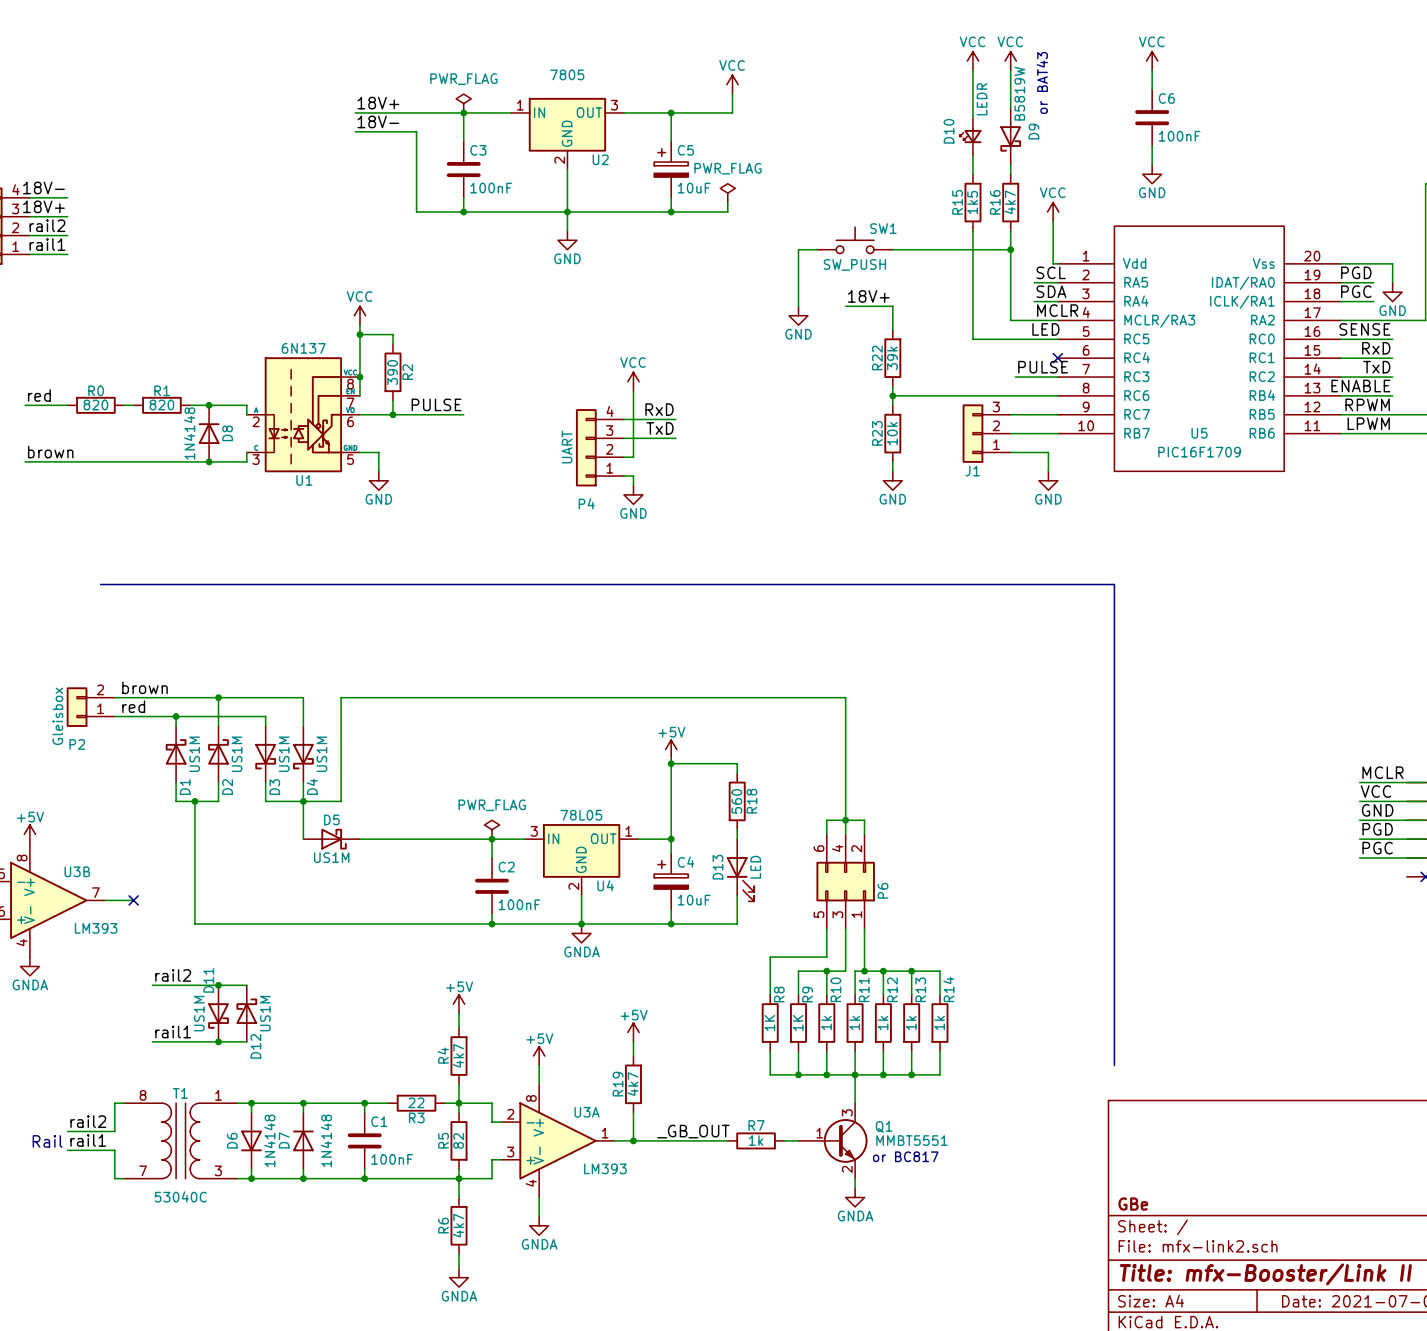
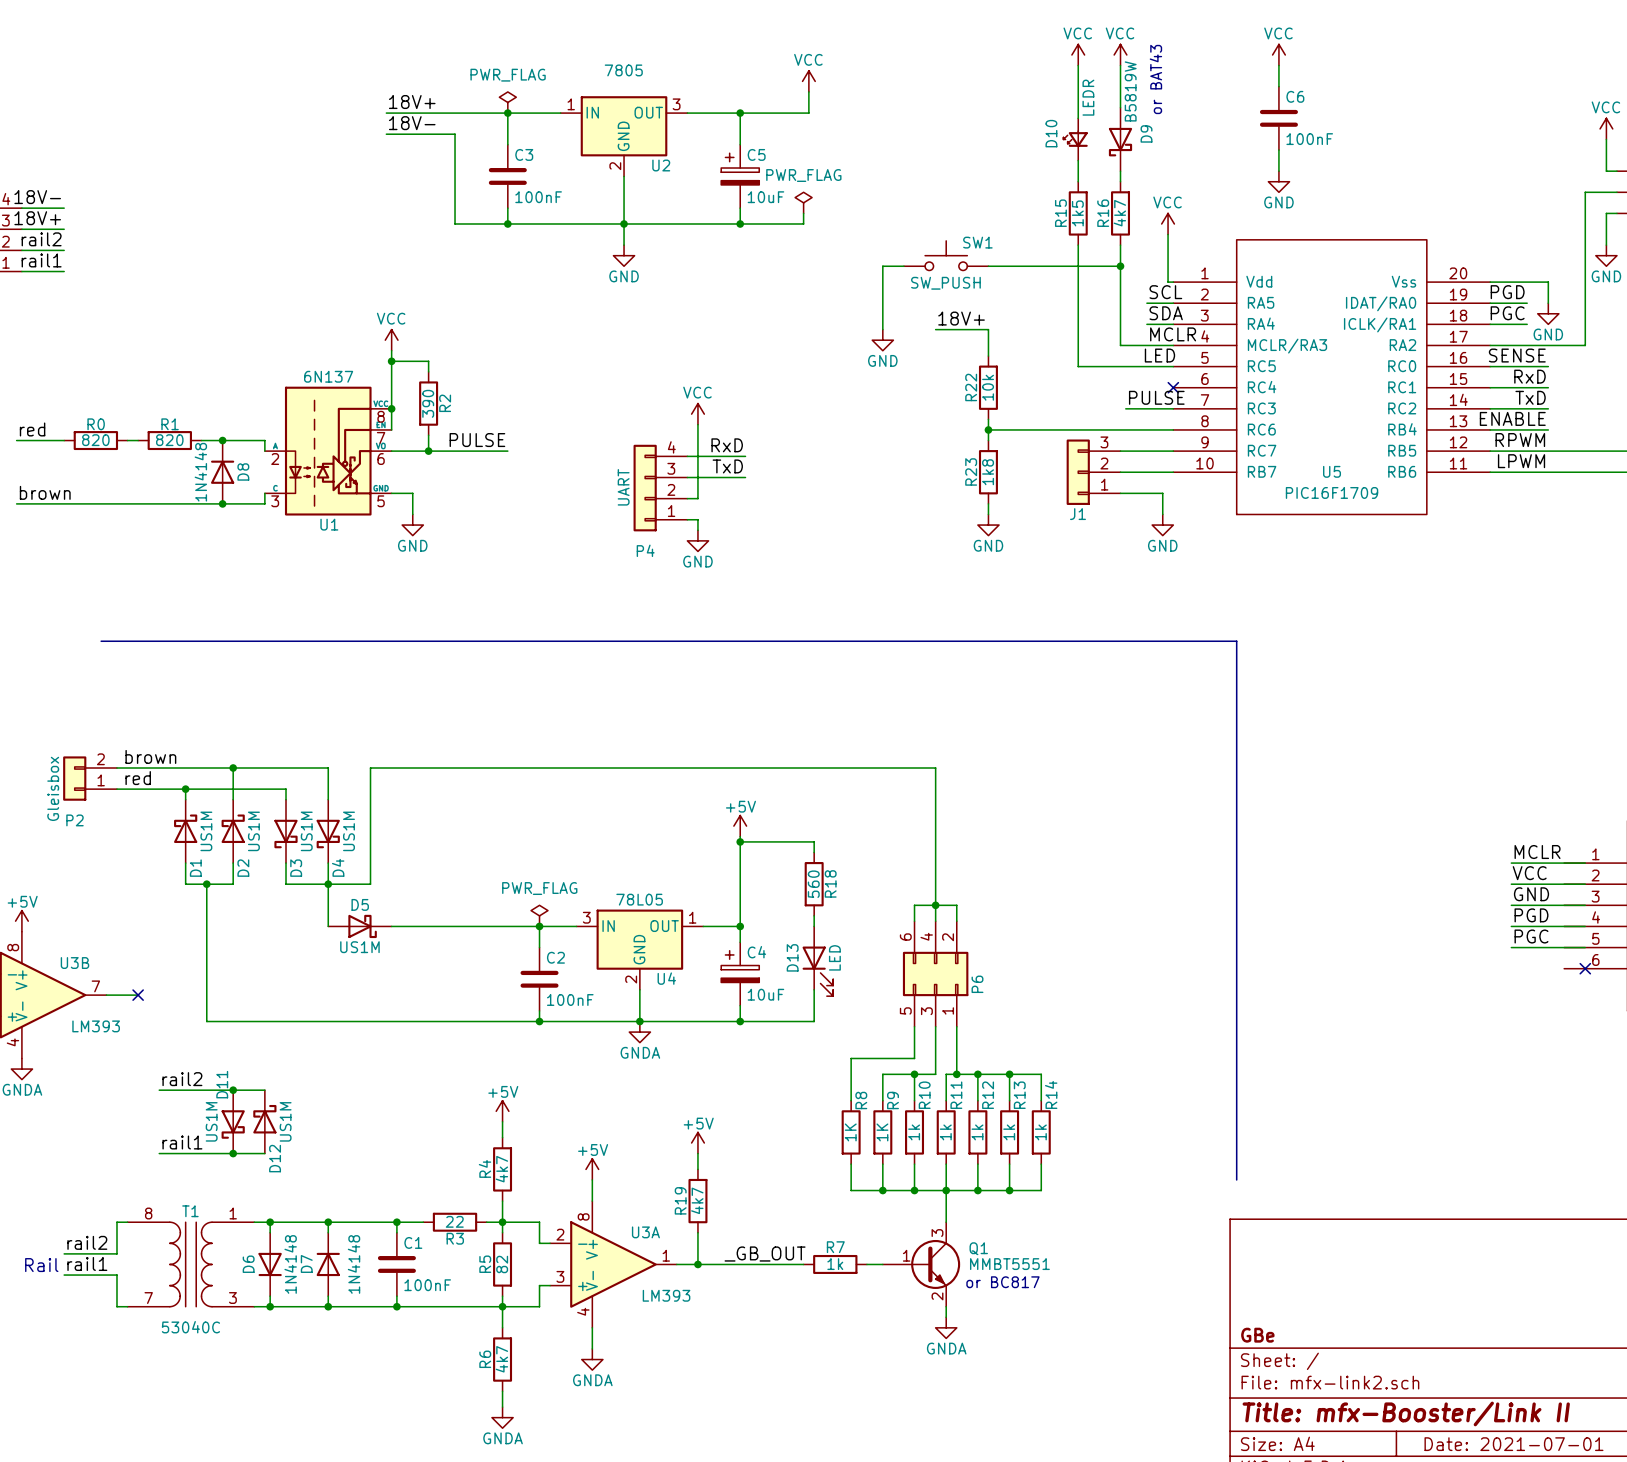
R22 value: 39k (892, 358) -> 10k (988, 387)
R23 value: 10k (892, 433) -> 1k8 (988, 472)

